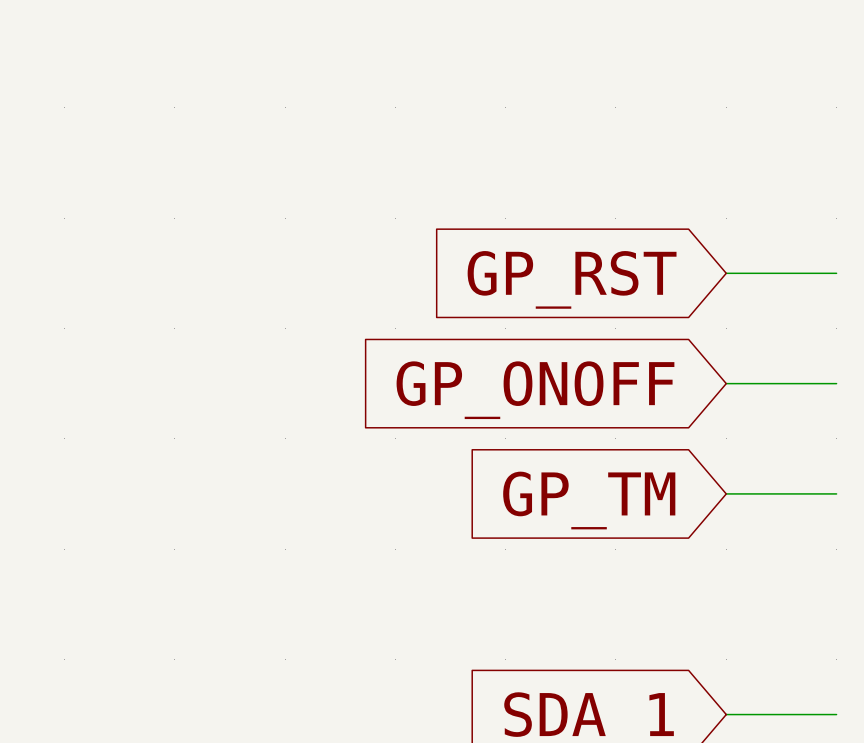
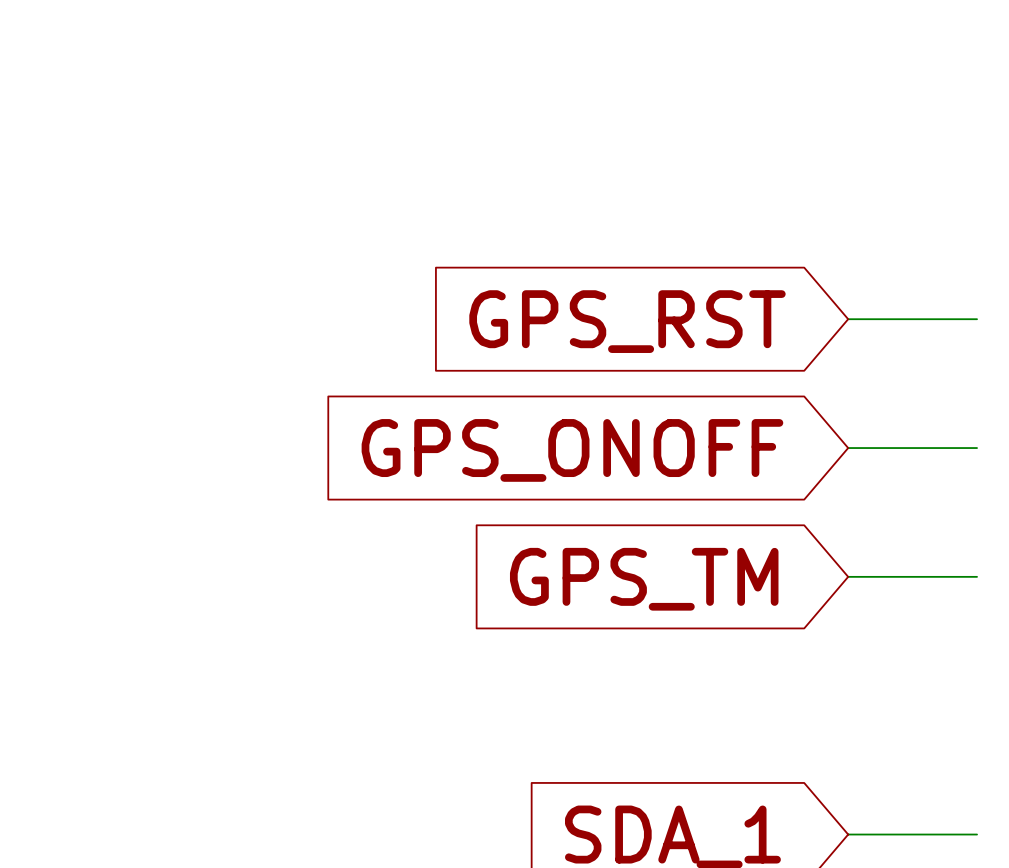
global label: GP_RST (572, 279) -> GPS_RST (627, 321)
global label: GP_ONOFF (535, 390) -> GPS_ONOFF (572, 450)
global label: GP_TM (589, 500) -> GPS_TM (644, 579)

